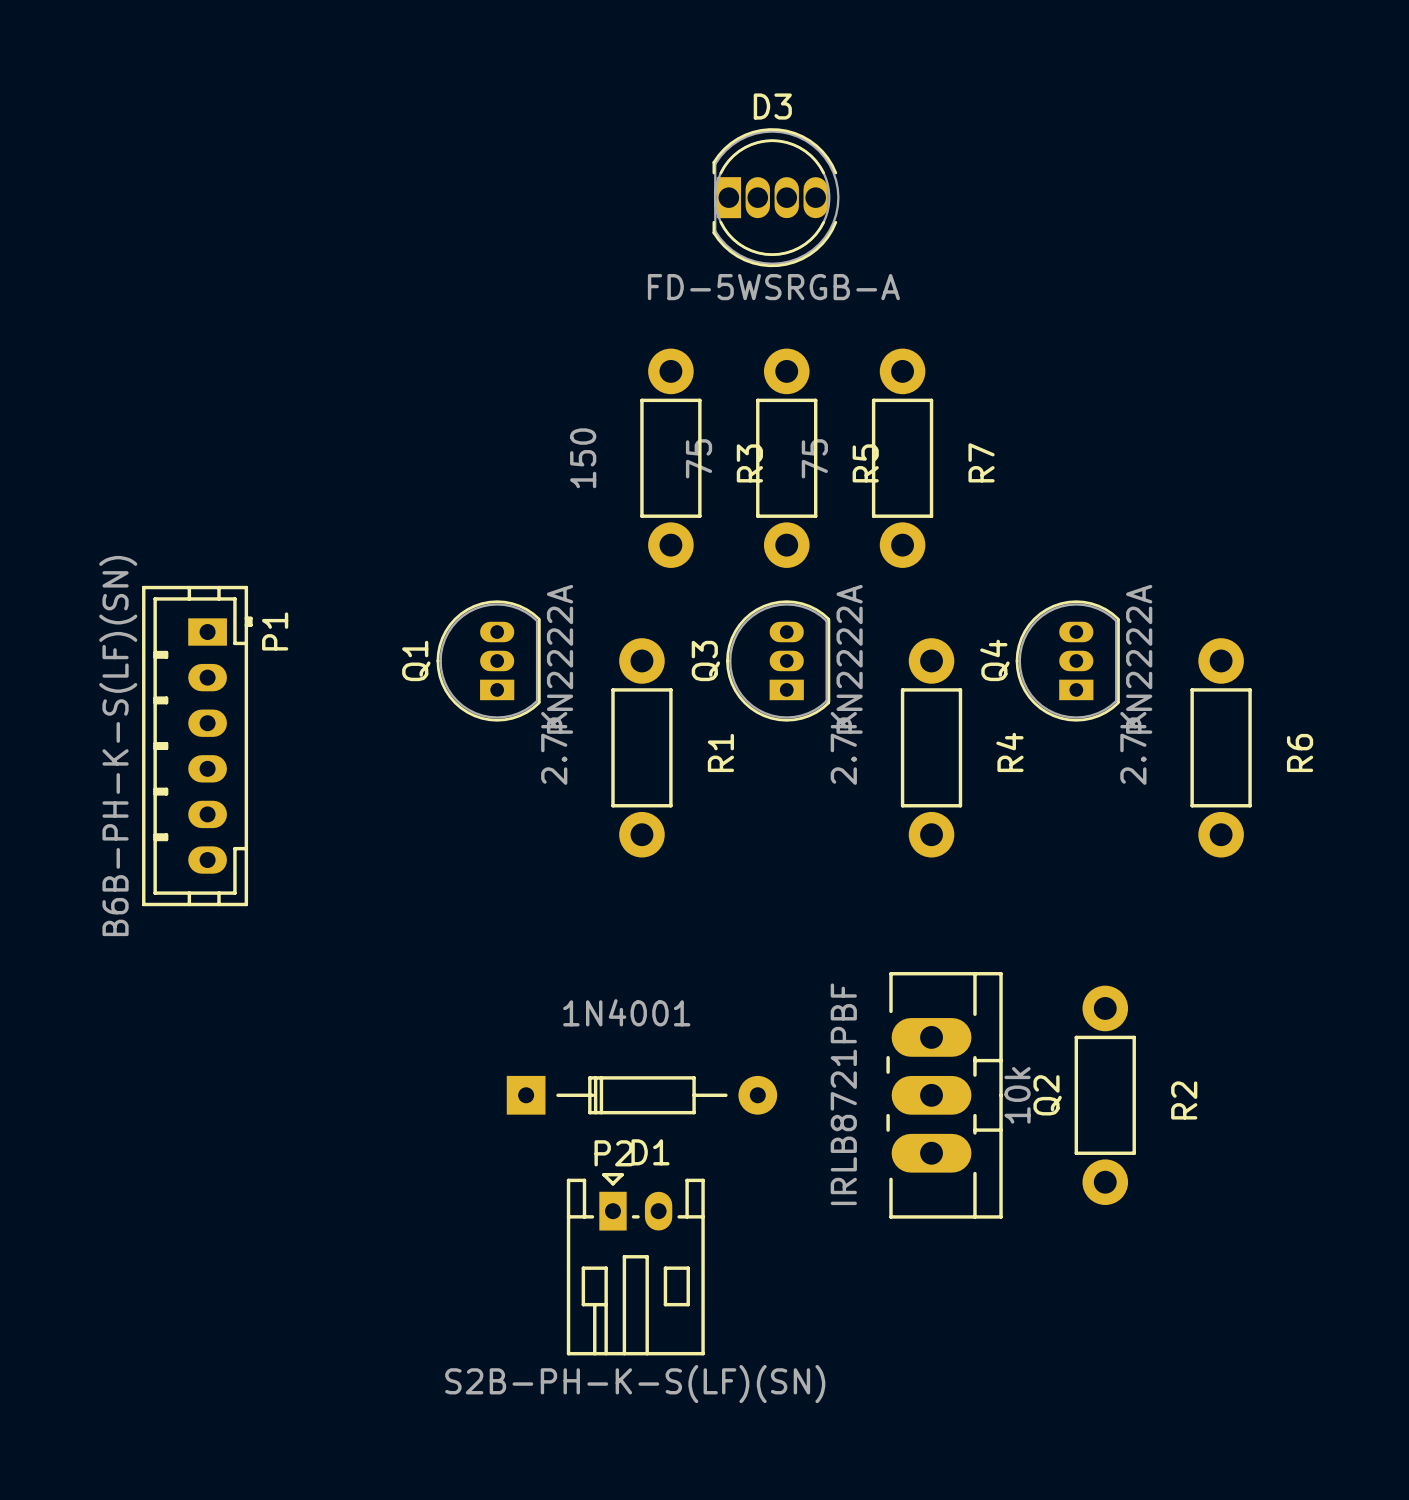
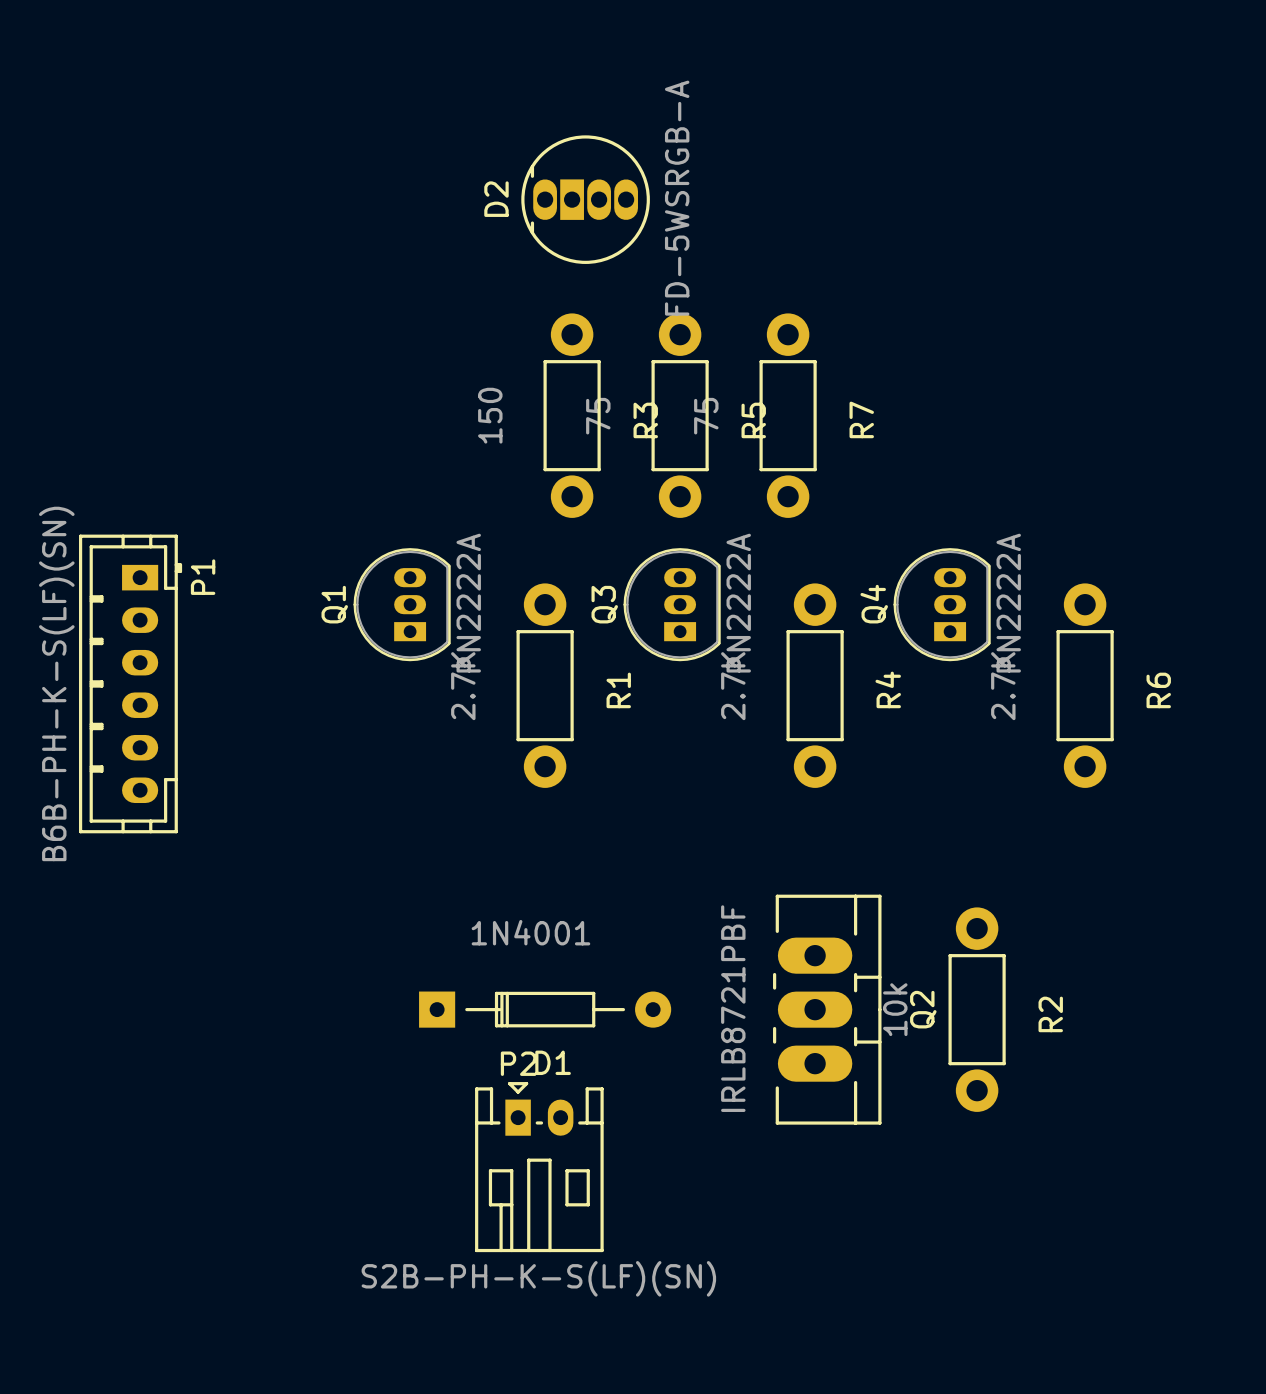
D3: FD-5WSRGB-A (776, 197) -> none
D2: none -> FD-5WSRGB-A (585, 199)

